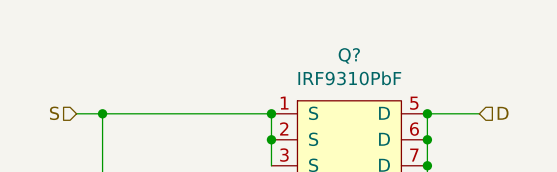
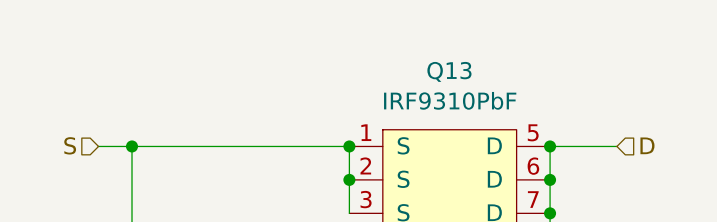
Q? name: Q? (349, 55) -> Q13 (449, 71)

